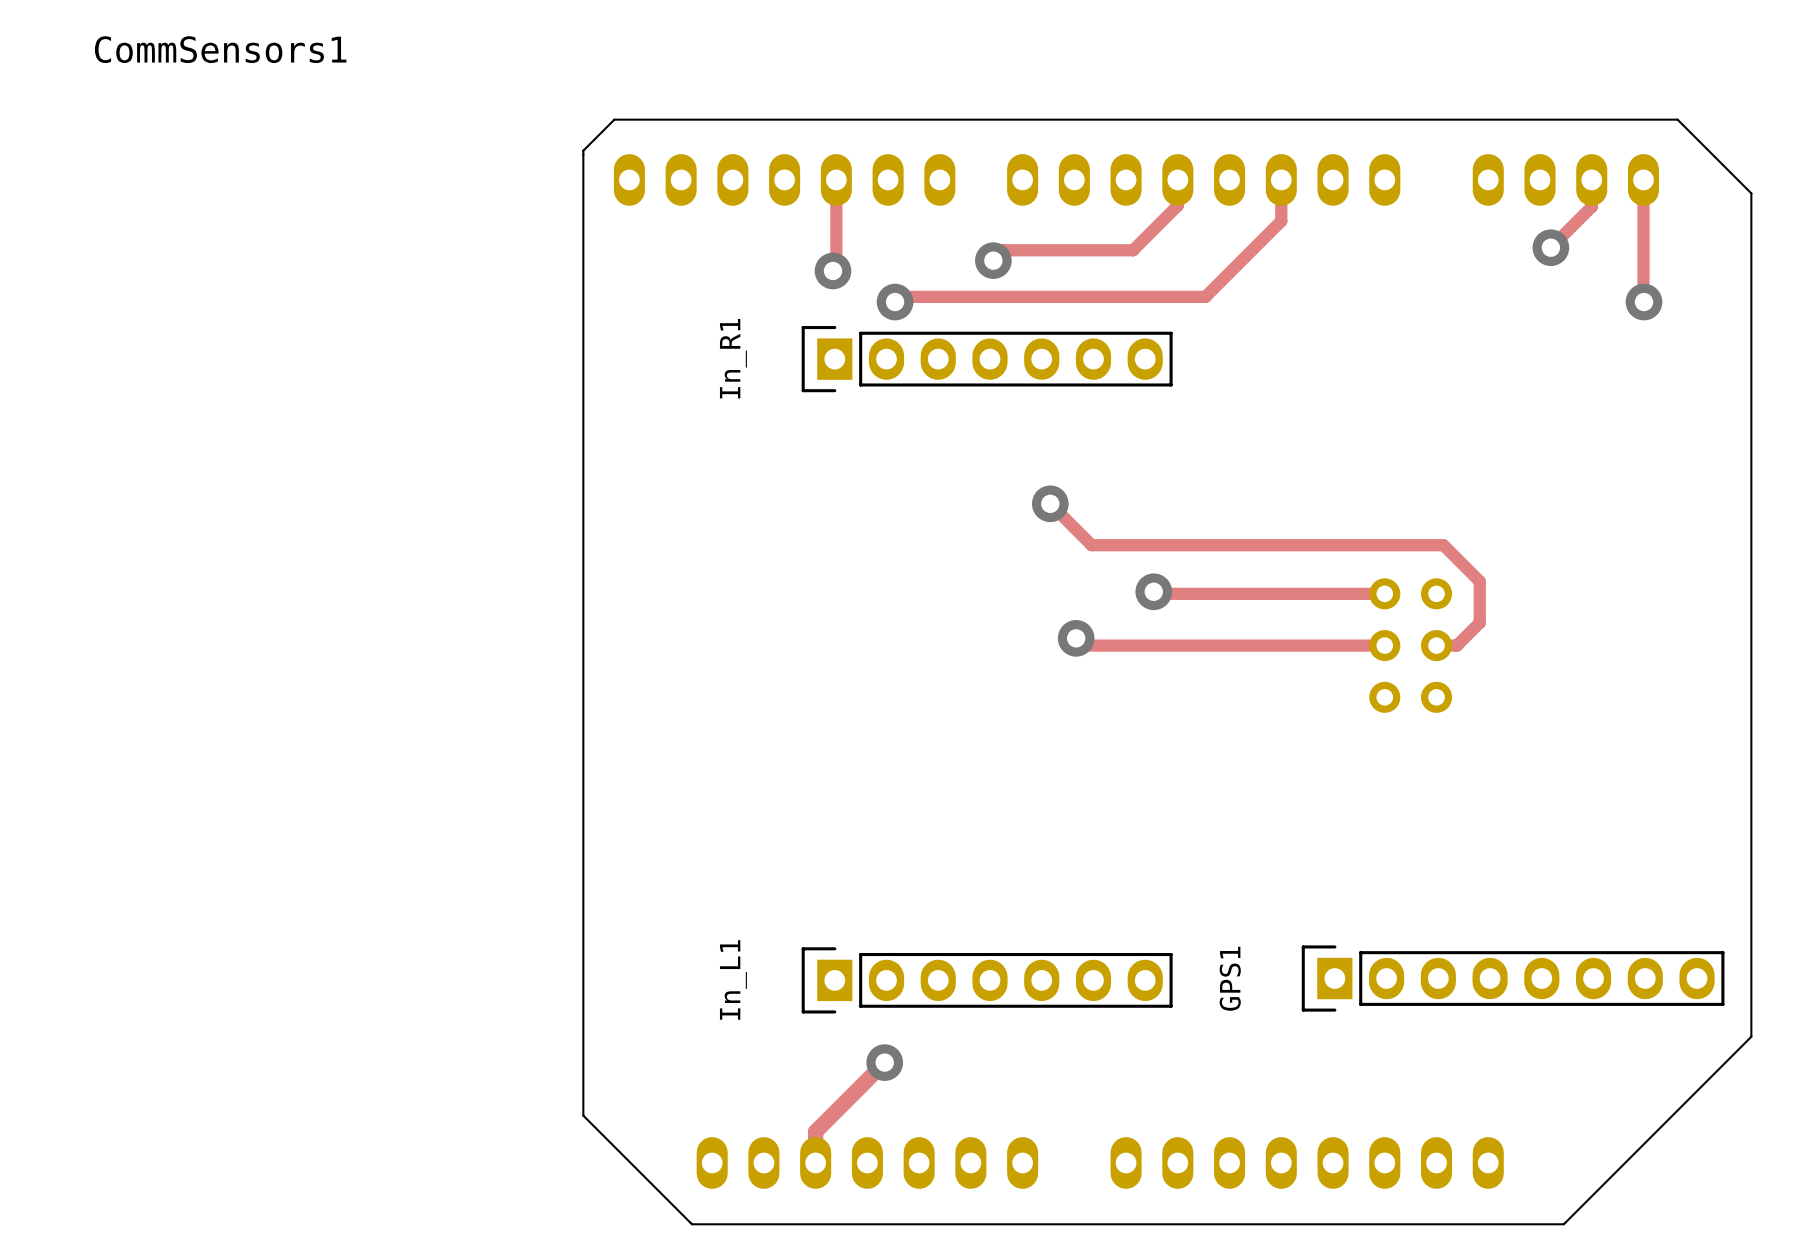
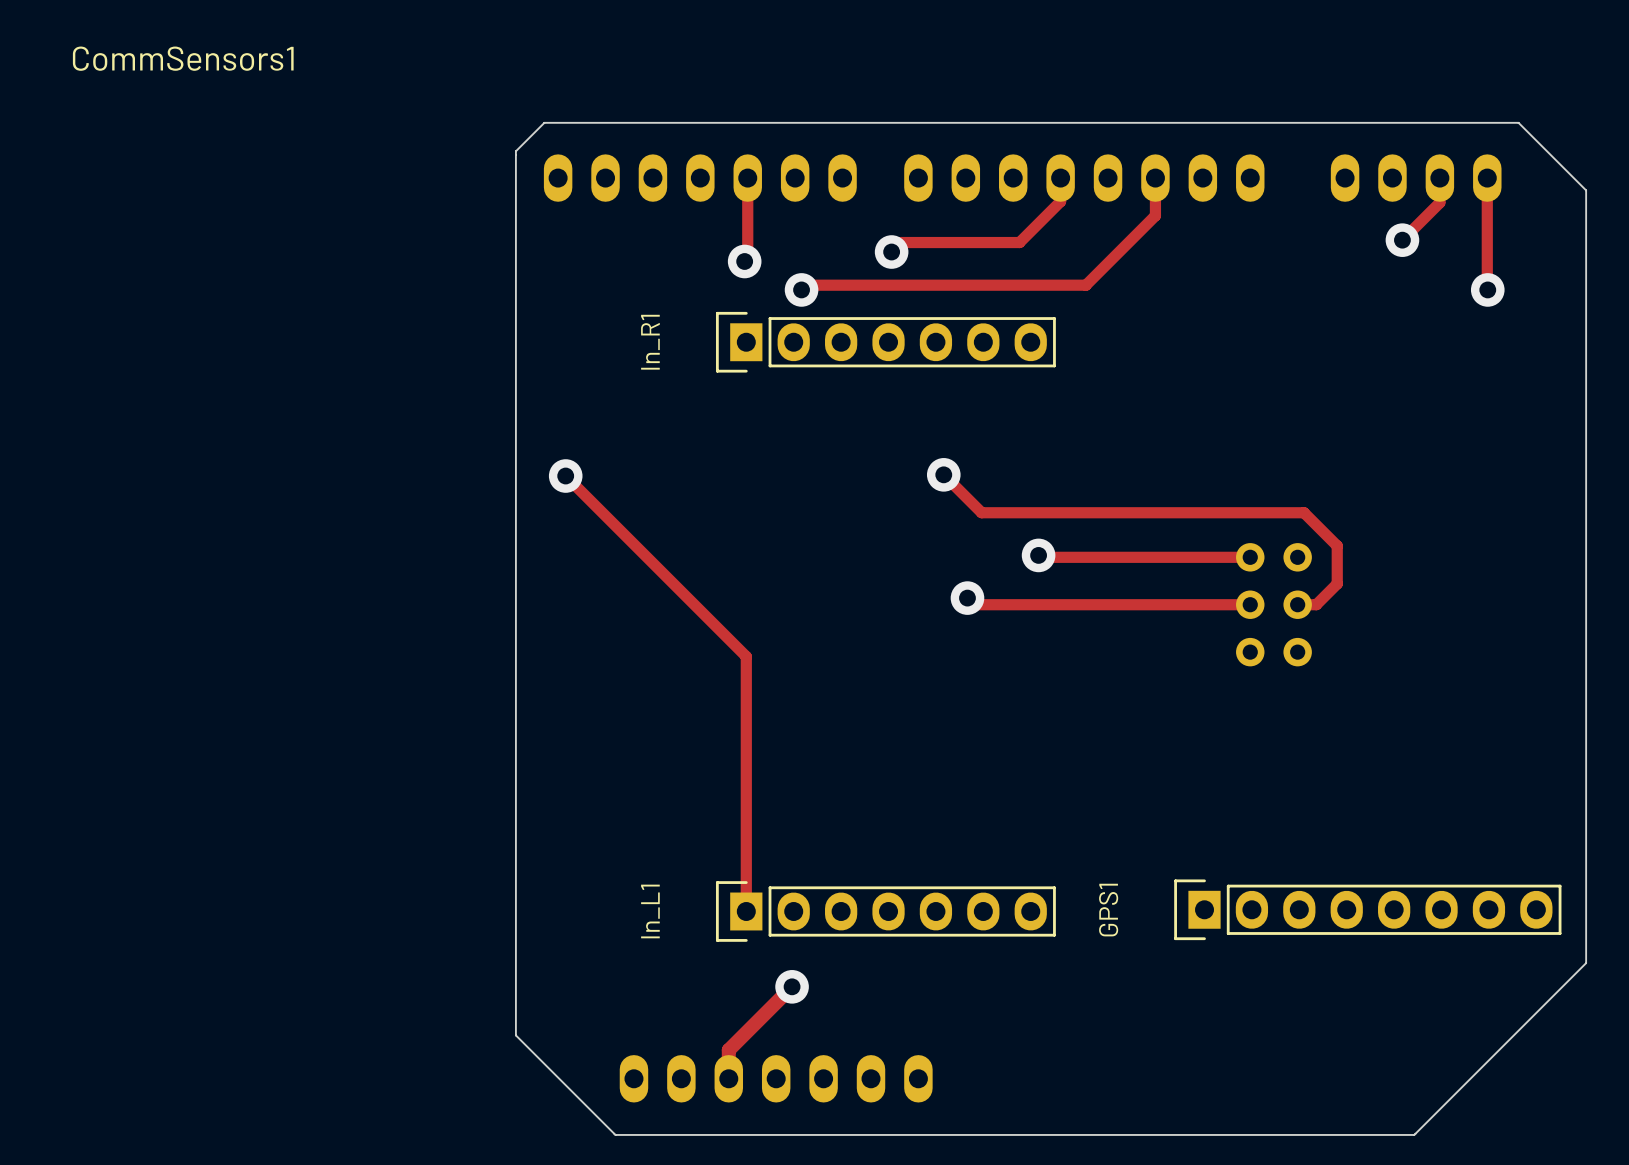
CommSensors1 footprint: [613, 154, 1660, 1189] -> [543, 154, 1502, 1103]
track: none -> (565, 476) (746, 656) (746, 911)
via: none -> (565, 476)

